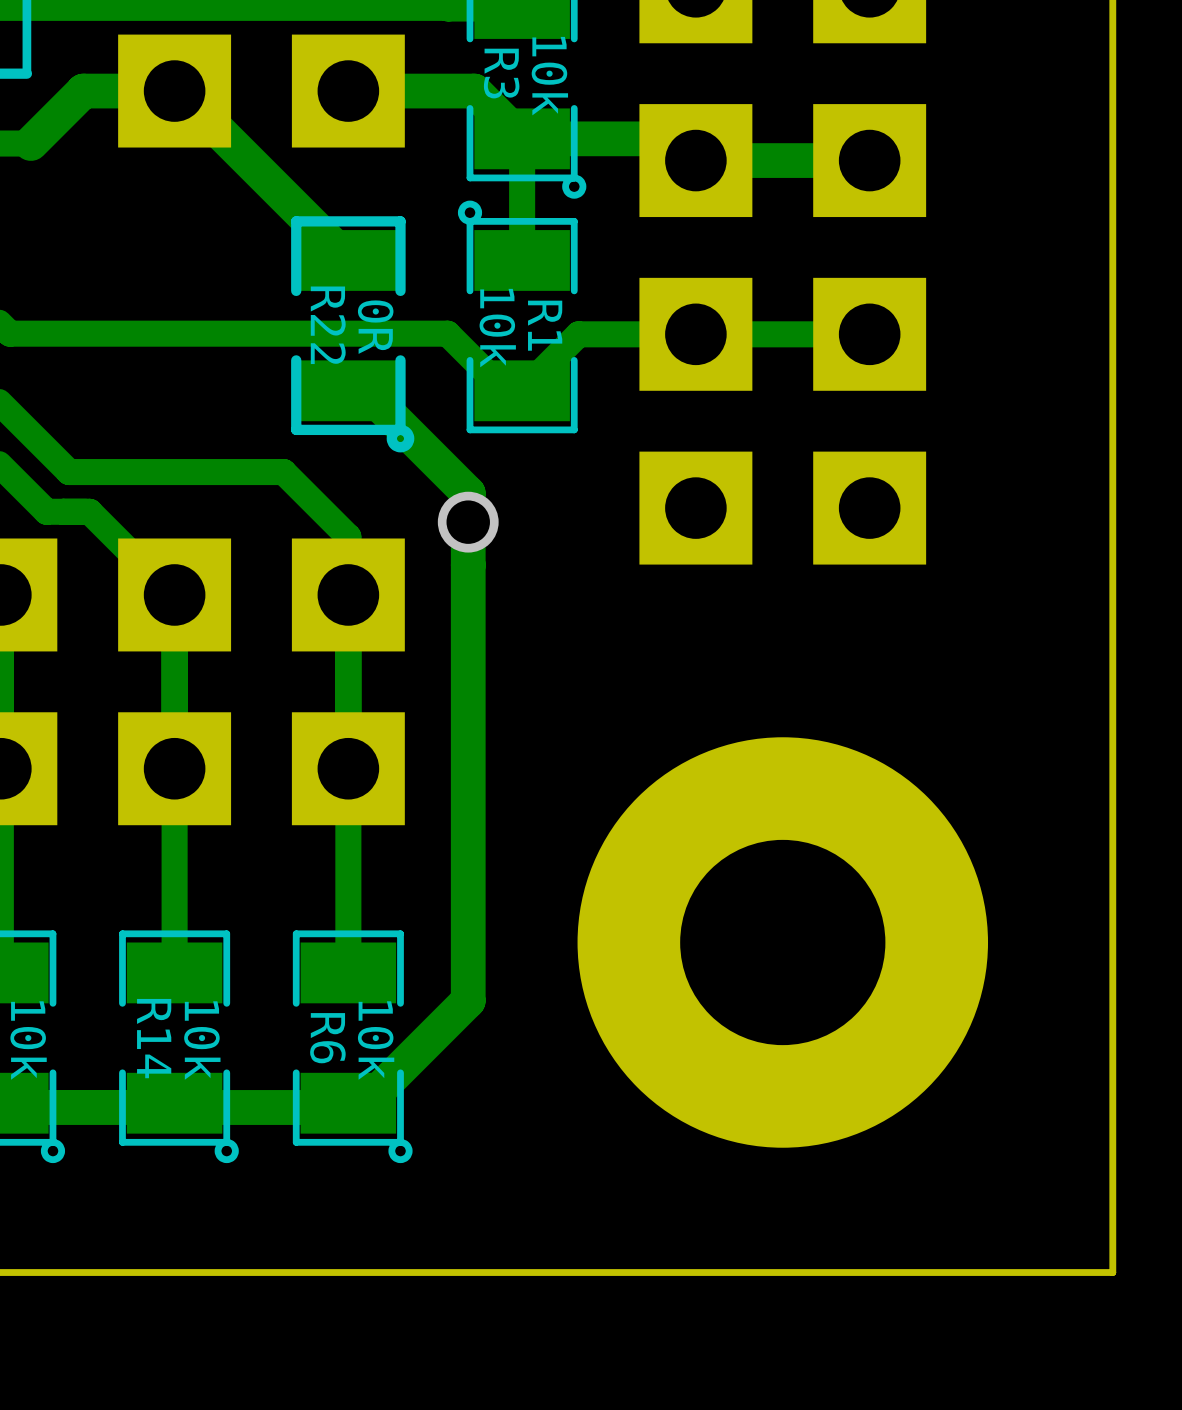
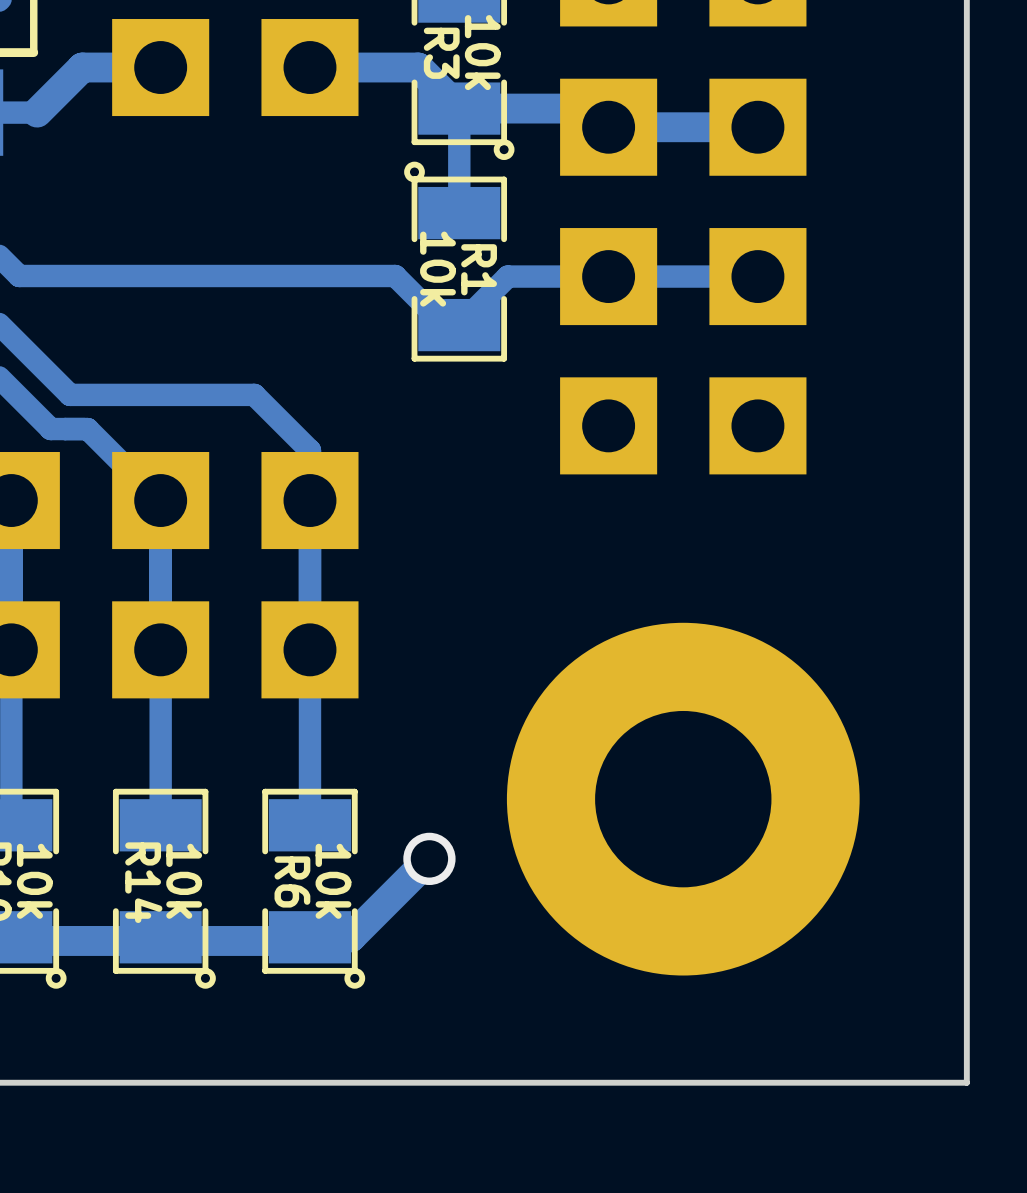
track: (178, 91) (348, 260) -> none
R22: 0R (352, 334) -> none
track: (348, 390) (365, 390) (468, 493) (468, 1000) (365, 1103) -> (429, 858) (351, 937) (324, 937)
via: (468, 522) -> none
via: none -> (429, 858)

